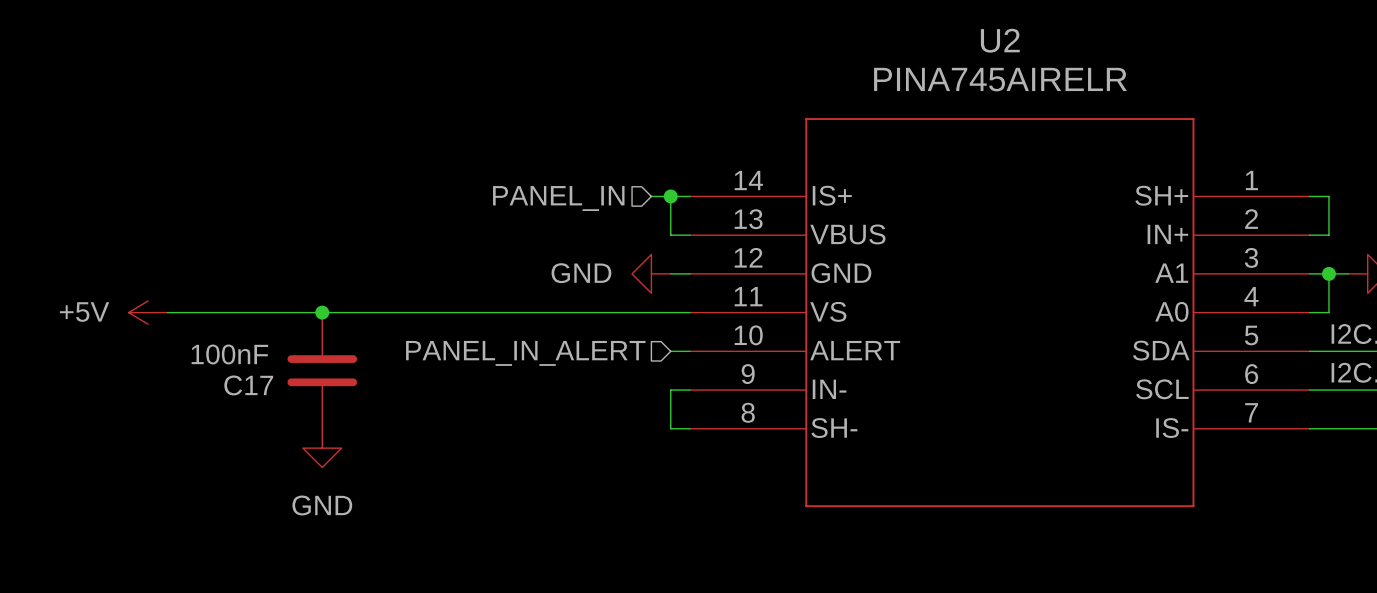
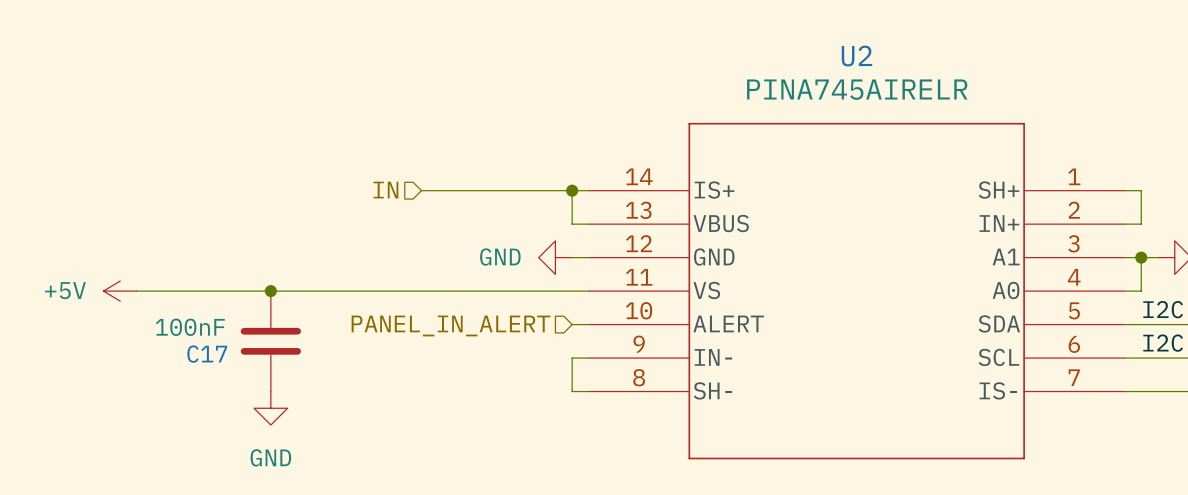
hierarchical label: none -> IN (385, 190)
wire: none -> (421, 190) (555, 190)
hierarchical label: PANEL_IN (558, 198) -> none

